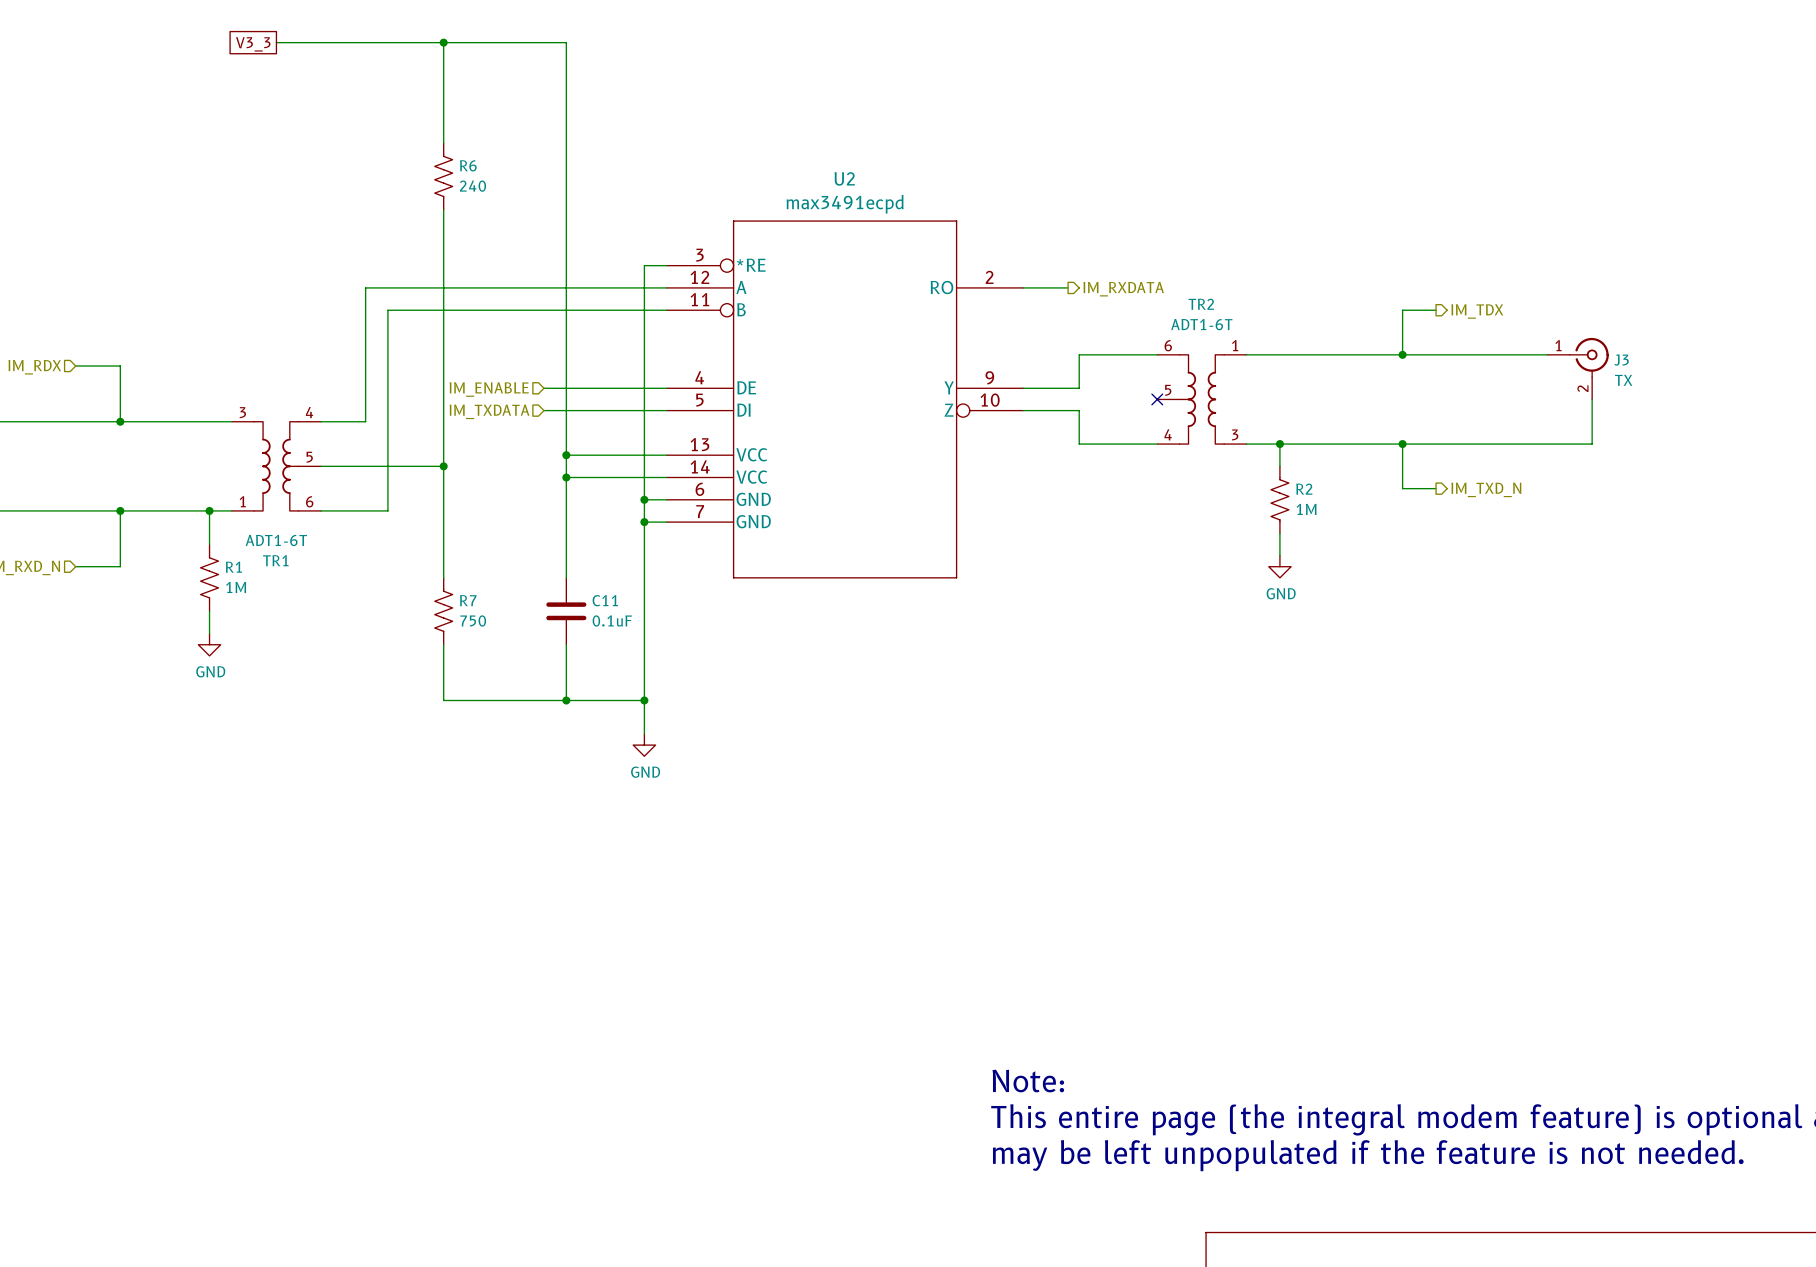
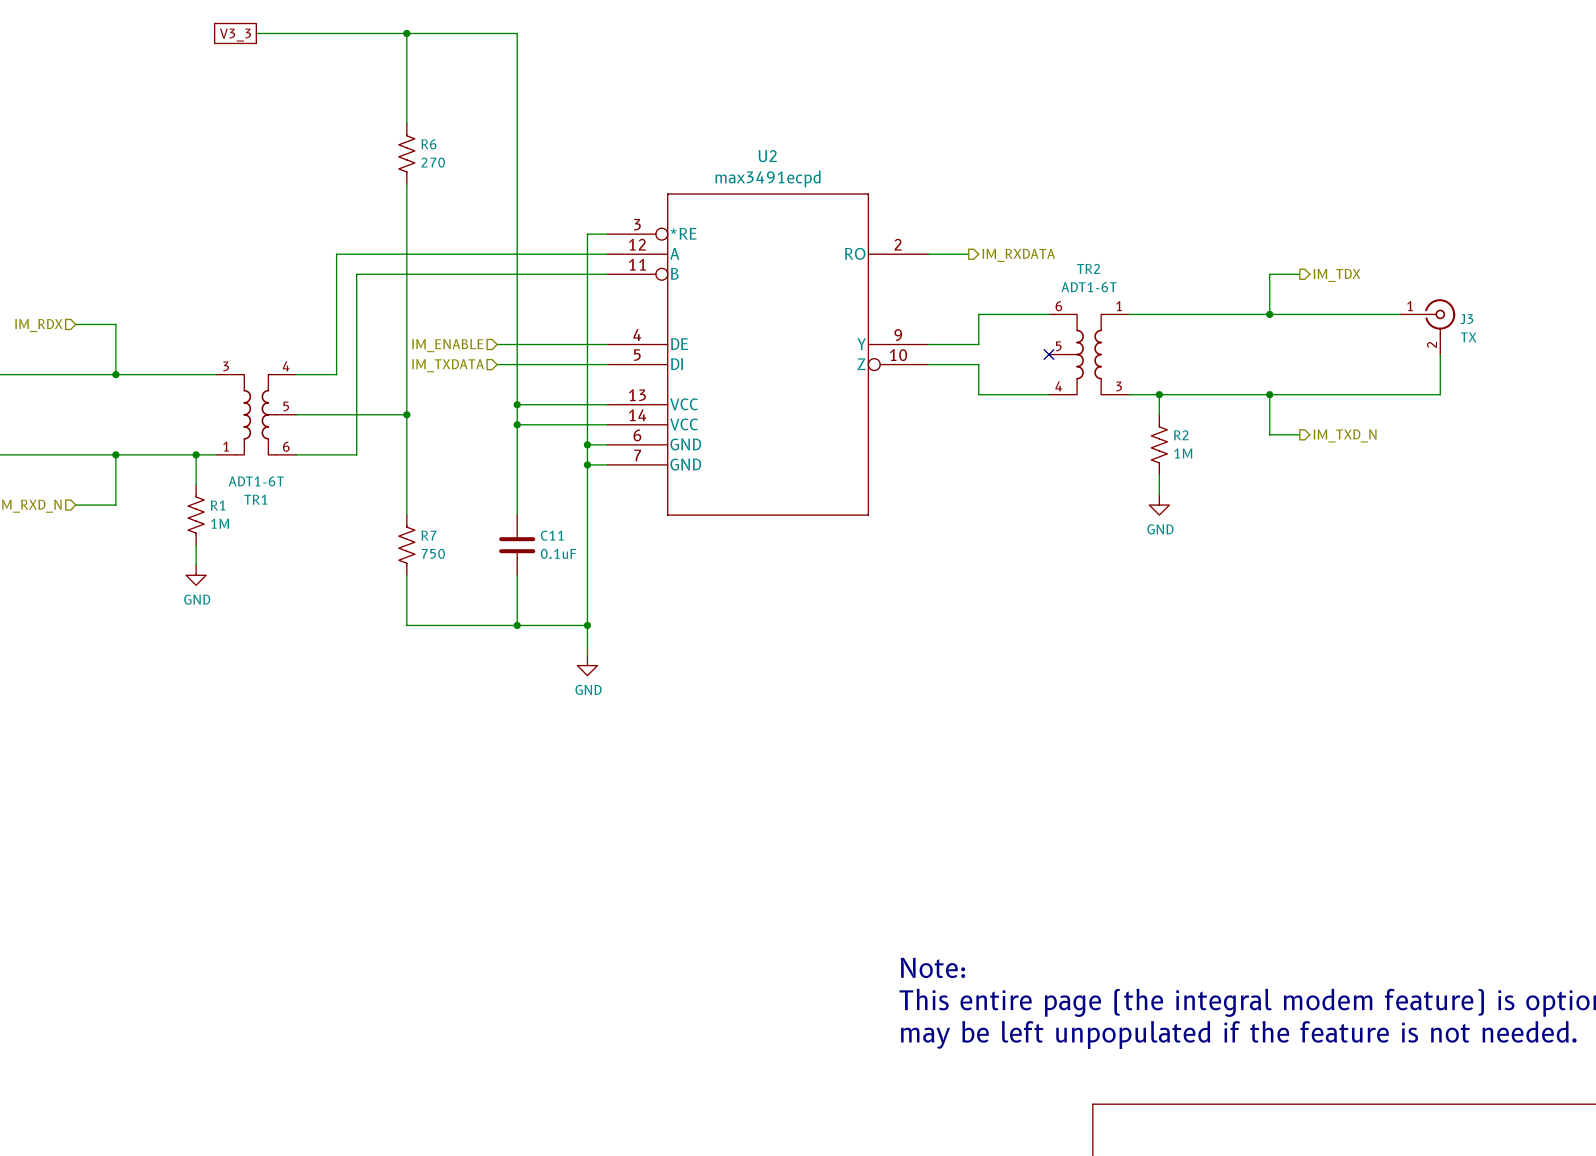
R6 value: 240 (473, 186) -> 270 (433, 162)

